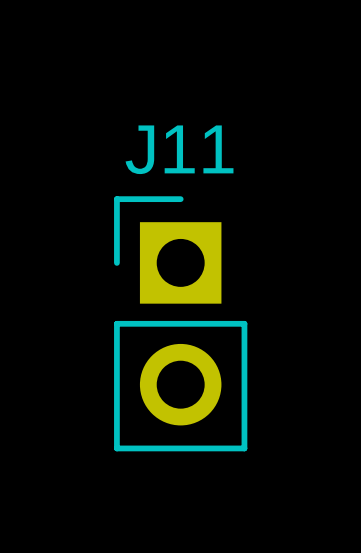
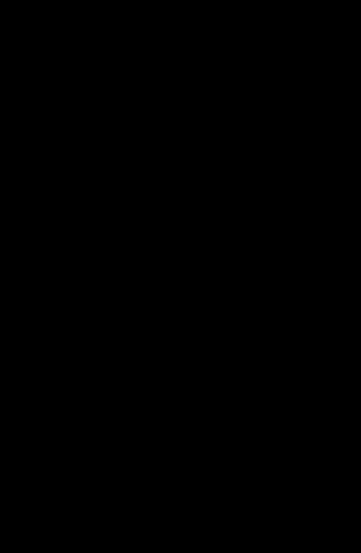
J11: (180, 323) -> none

